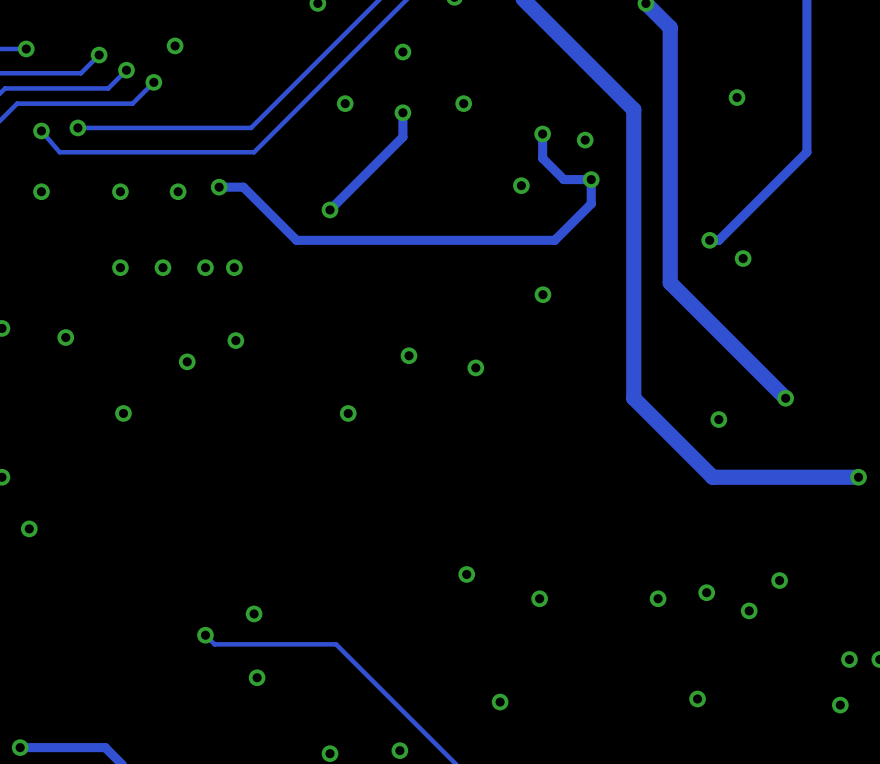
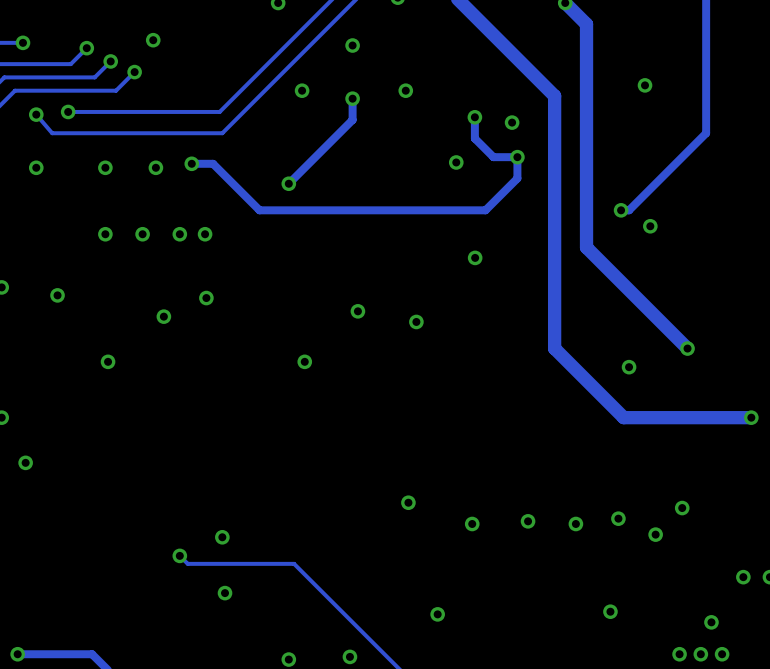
via: none -> (528, 521)
via: (840, 705) -> none
via: none -> (711, 622)
via: none -> (679, 654)
via: none -> (700, 654)
via: none -> (722, 654)

